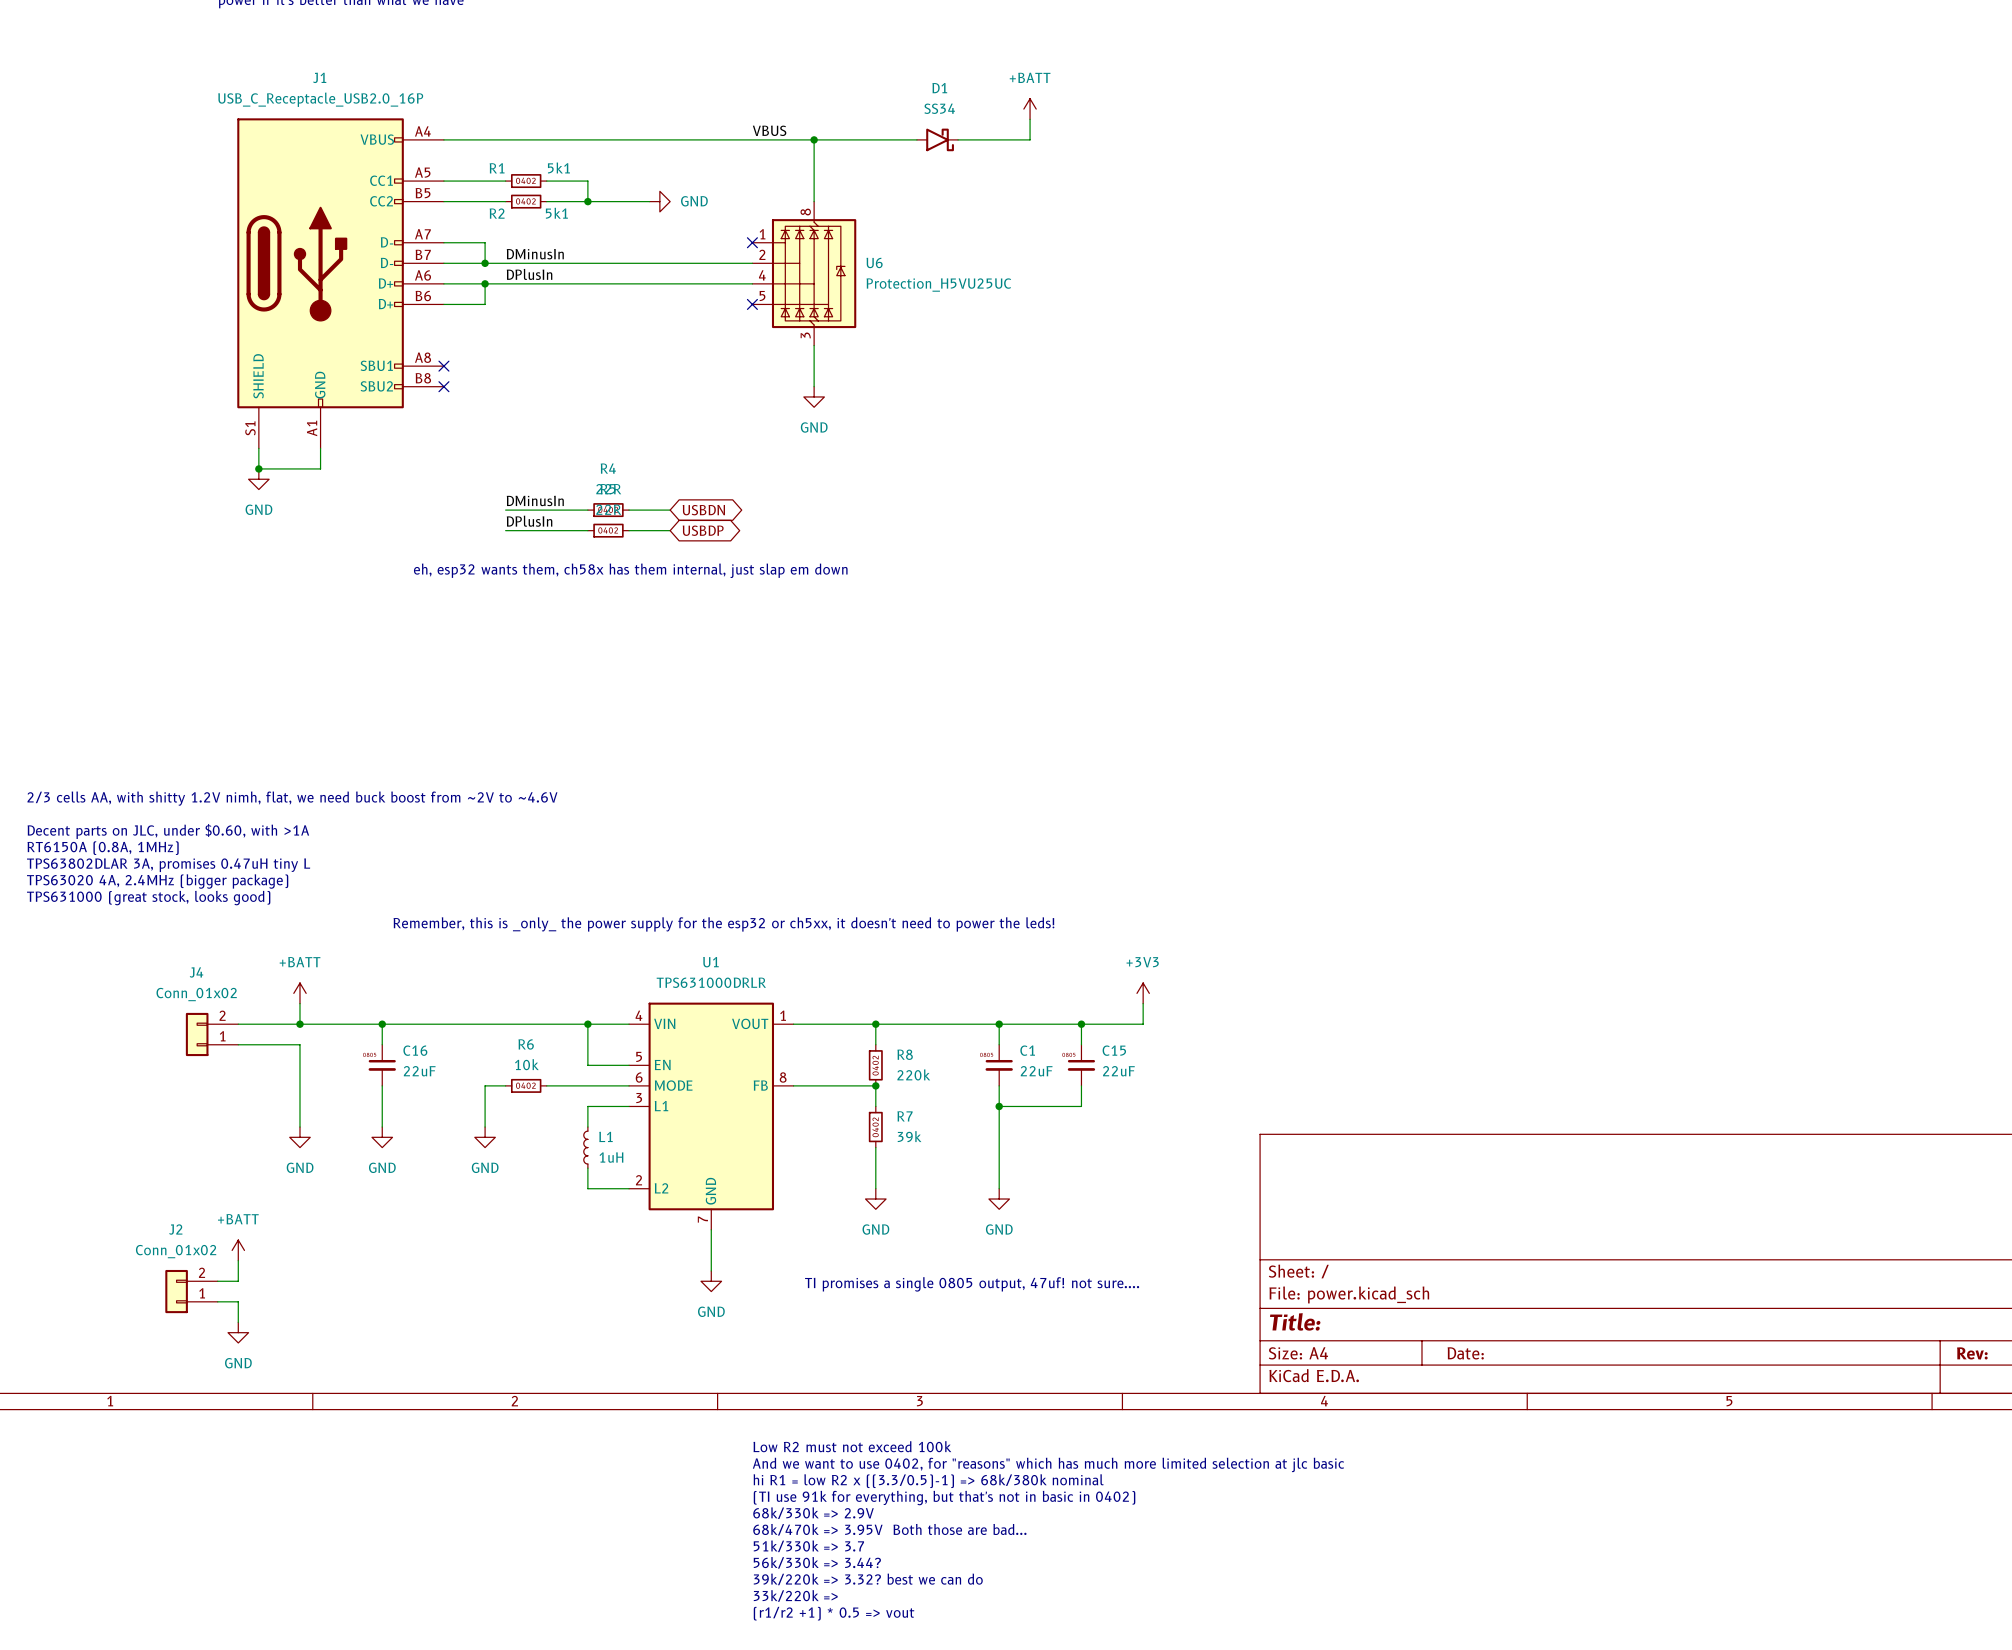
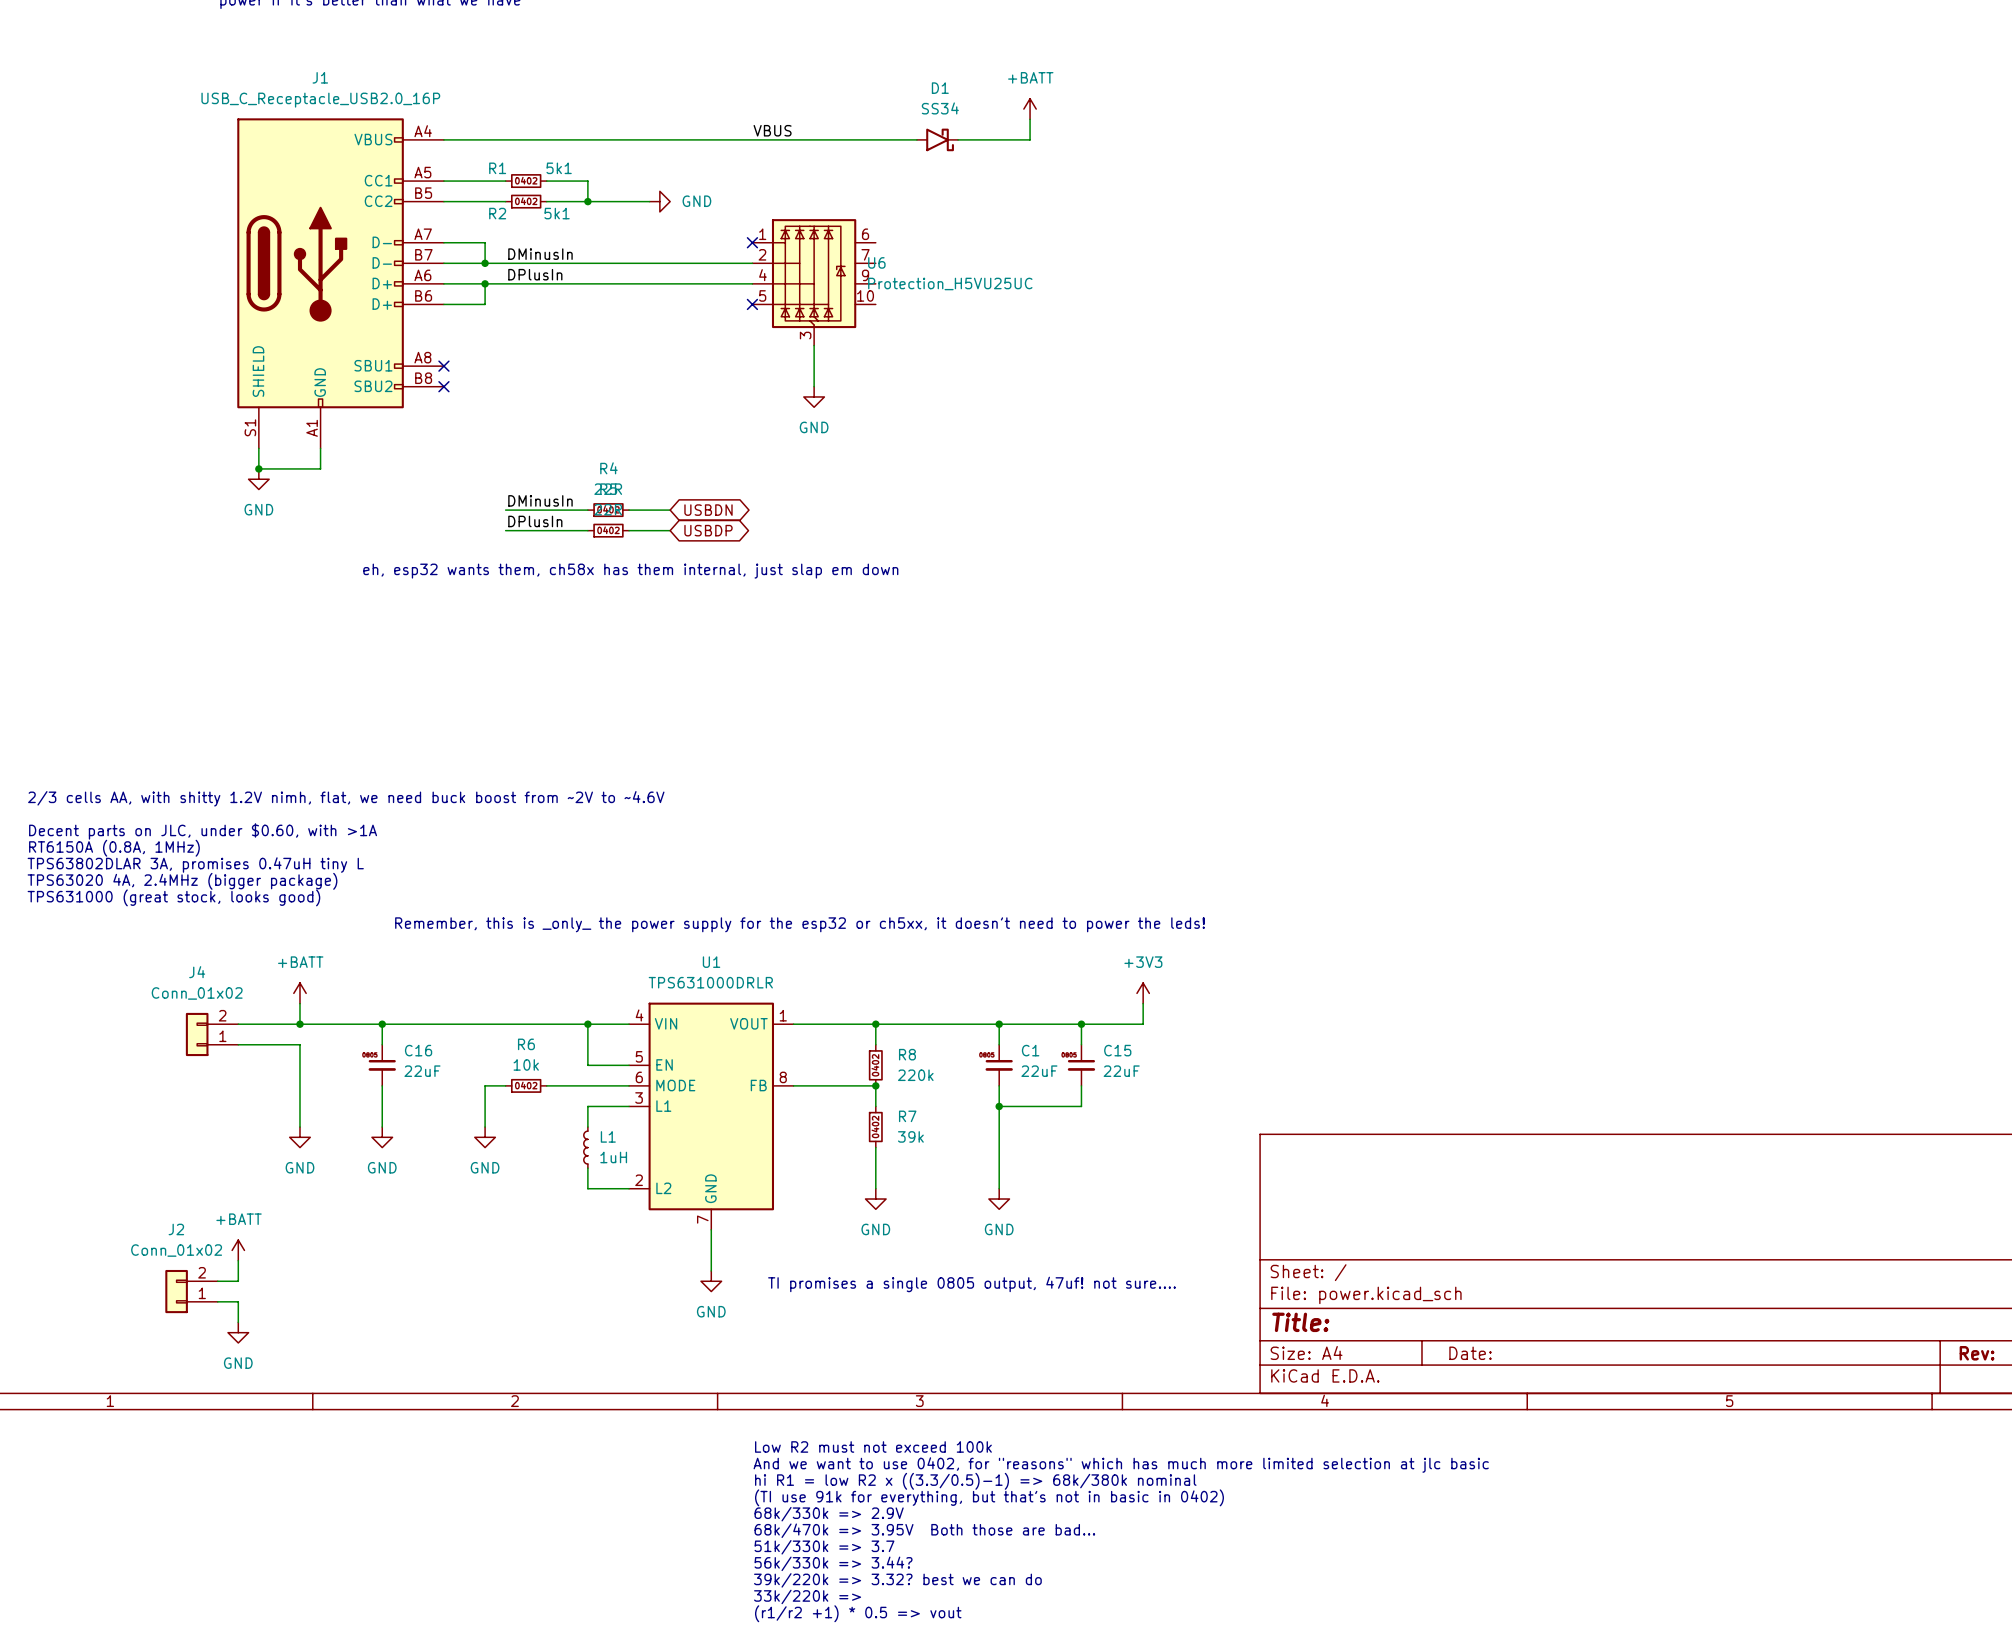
wire: (814, 139) (814, 201) -> none
junction: (814, 139) -> none
U6 symbol: [752, 201, 857, 346] -> [752, 219, 876, 346]

